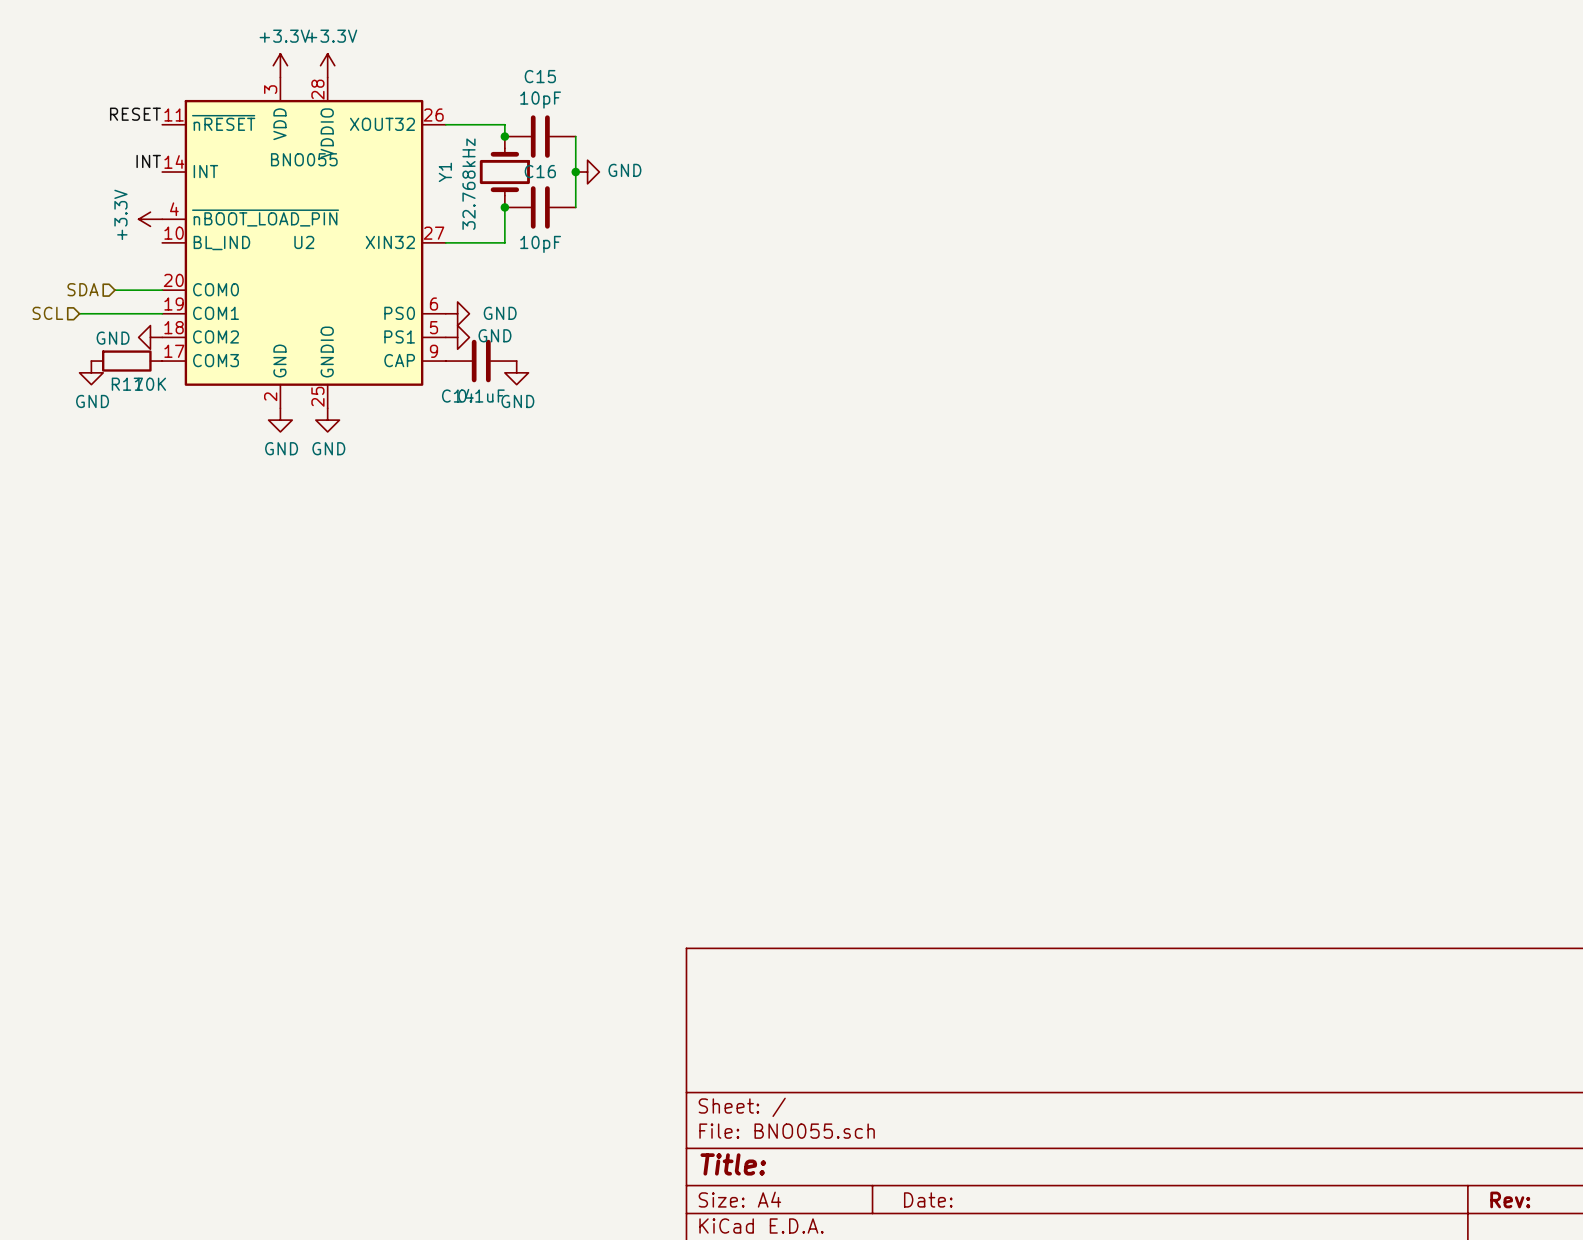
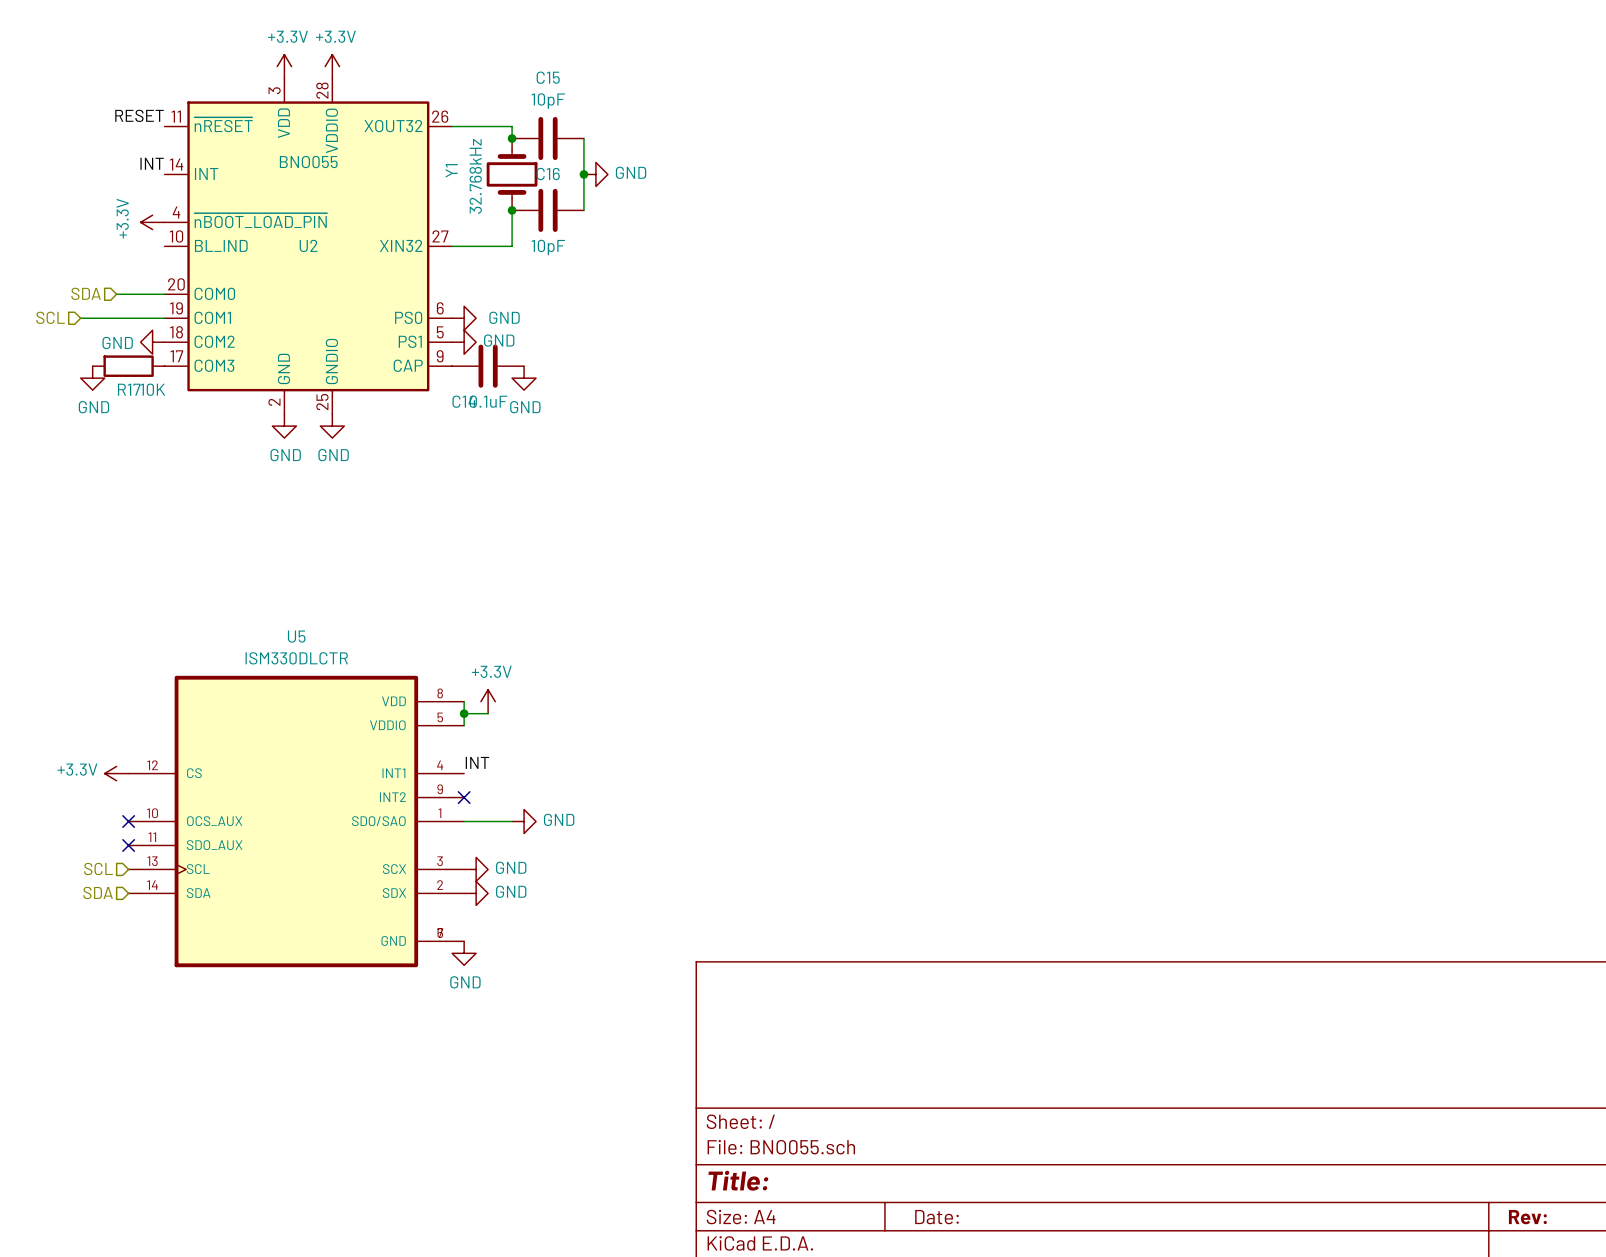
wire: none -> (464, 701) (464, 725)
power symbol: none -> +3.3V (488, 701)
wire: none -> (464, 713) (488, 713)
junction: none -> (464, 713)
label: none -> INT (477, 762)
power symbol: none -> +3.3V (116, 773)
no-connect mark: none -> (464, 797)
no-connect mark: none -> (128, 821)
U5: none -> ISM330DLCTR (296, 821)
wire: none -> (464, 821) (512, 821)
power symbol: none -> GND (524, 821)
no-connect mark: none -> (128, 845)
hierarchical label: none -> SCL (98, 869)
power symbol: none -> GND (476, 869)
hierarchical label: none -> SDA (98, 892)
power symbol: none -> GND (476, 893)
power symbol: none -> GND (464, 953)

